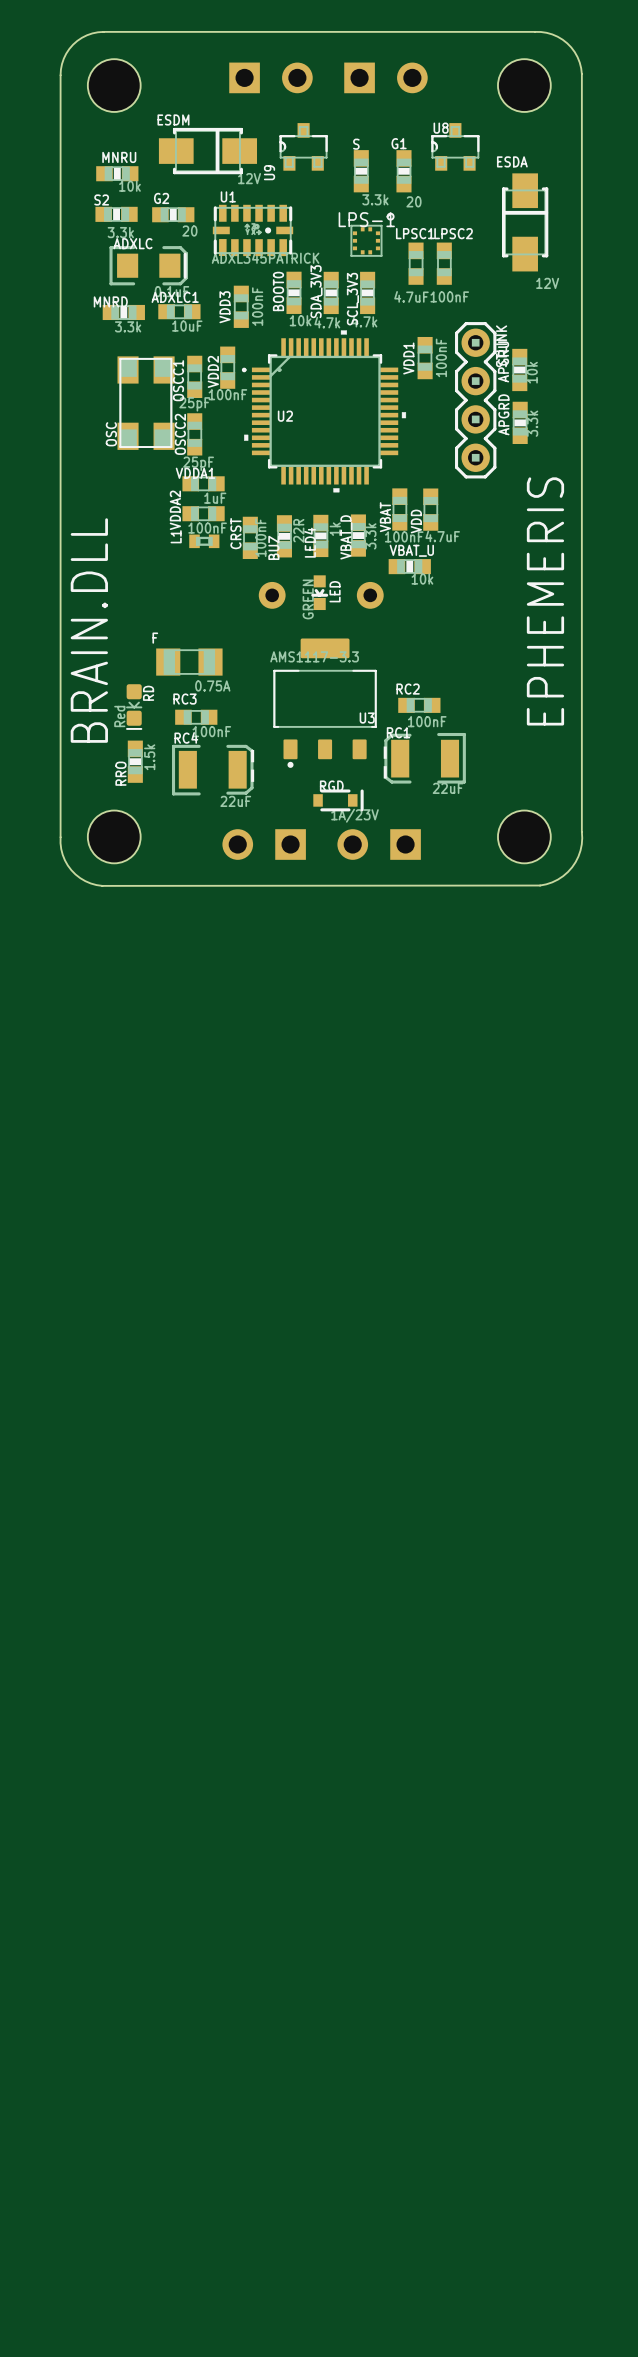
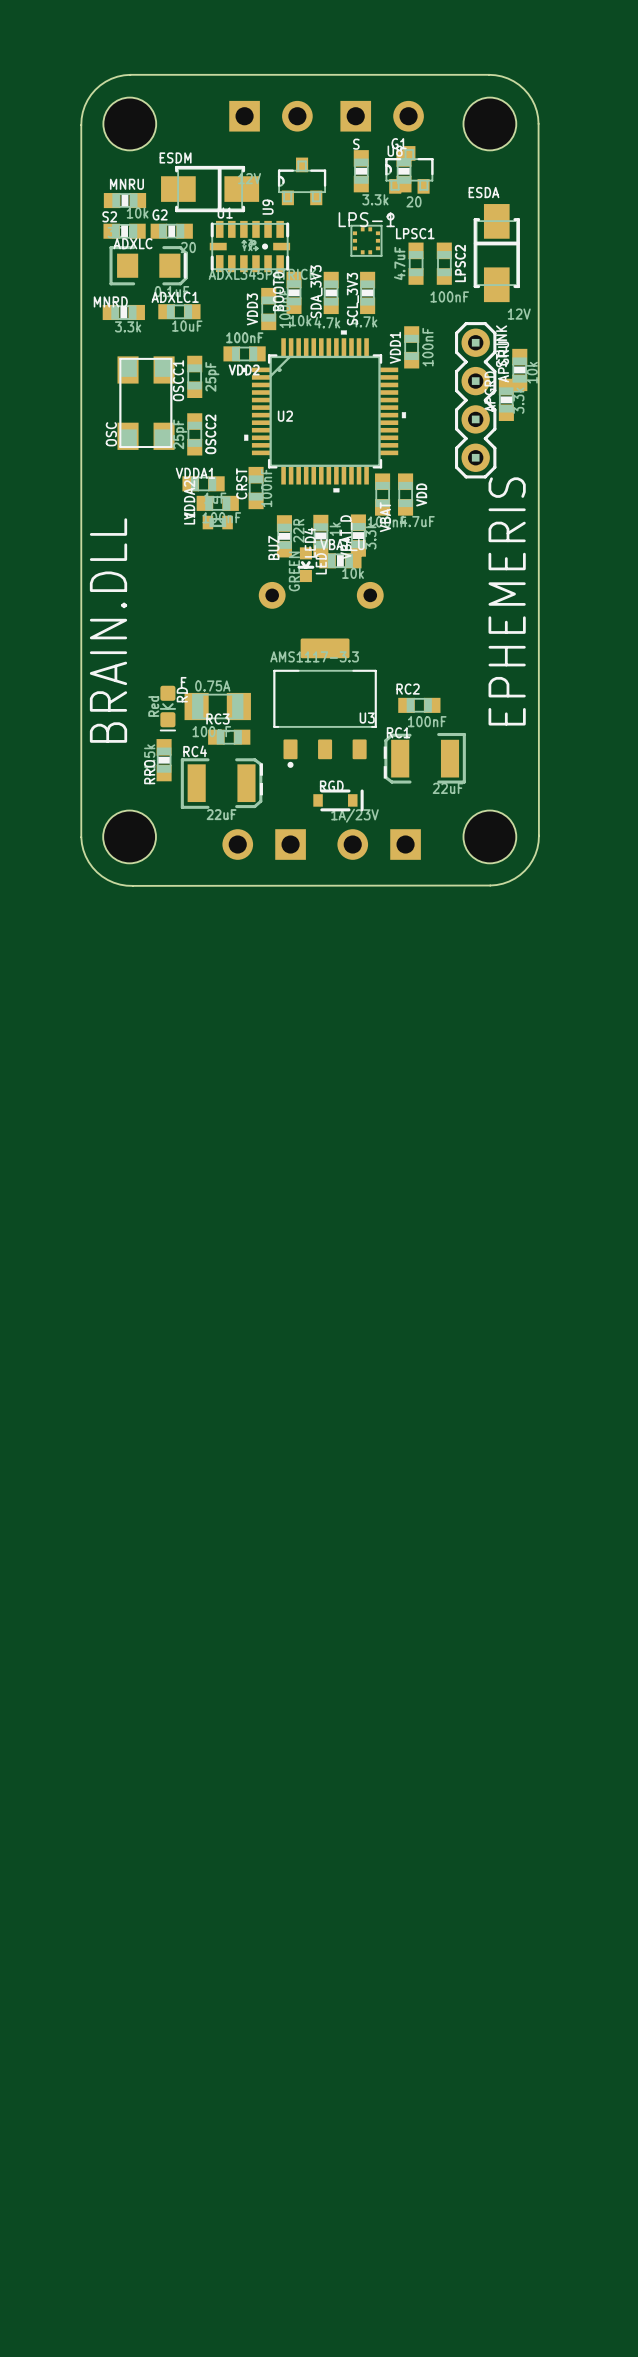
board edge: (103, 31) (540, 31) (552, 34) (562, 39) (571, 47) (577, 57) (581, 74) (582, 838) (580, 850) (575, 862) (567, 872) (557, 879) (540, 885) (102, 885) (90, 883) (80, 878) (71, 870) (64, 860) (60, 843) (60, 75) (63, 58) (73, 44) (87, 35) (103, 31) -> (130, 74) (117, 76) (100, 85) (87, 100) (81, 118) (81, 837) (85, 856) (92, 867) (102, 876) (113, 882) (126, 885) (490, 885) (509, 881) (524, 870) (532, 860) (537, 848) (538, 835) (538, 123) (534, 105) (528, 93) (519, 84) (507, 78) (495, 75) (130, 74)
part position: (270, 77) -> (270, 116)
part position: (385, 77) -> (382, 116)
hole position: (114, 85) -> (129, 123)
hole position: (524, 85) -> (489, 123)
U9 position: (303, 146) -> (302, 181)
U8 position: (455, 146) -> (409, 169)
ESDM position: (207, 151) -> (210, 189)
MNRU position: (117, 173) -> (124, 200)
S2 position: (116, 214) -> (124, 231)
G2 position: (173, 214) -> (171, 231)
ESDA position: (525, 222) -> (496, 253)
U1 position: (253, 230) -> (249, 246)
LPSC2 name rotation: 0° (453, 233) -> 90° counterclockwise (460, 263)
LPSC1 value rotation: 0° (411, 296) -> 90° counterclockwise (399, 263)
VDD3 position: (241, 306) -> (268, 309)
VDD1 position: (425, 358) -> (411, 347)
VDD2 rotation: 0° (227, 367) -> 90° clockwise (244, 353)
VDD2 value position: 100nF (227, 394) -> 100nF (244, 337)
OSCC1 value rotation: 0° (194, 404) -> 90° counterclockwise (212, 376)
APGRD position: (520, 422) -> (506, 399)
OSCC2 name position: OSCC2 (180, 434) -> OSCC2 (210, 434)
OSCC2 value rotation: 0° (198, 463) -> 90° counterclockwise (180, 434)
VBAT position: (399, 509) -> (382, 494)
VDD position: (430, 509) -> (405, 494)
VDDA2 position: (203, 513) -> (217, 503)
VDD name position: VDD (416, 521) -> VDD (421, 494)
CRST position: (250, 537) -> (256, 488)
L1 position: (204, 541) -> (217, 522)
VBAT_U position: (409, 566) -> (340, 560)
LED position: (319, 592) -> (305, 564)
text position: EPHEMERIS (545, 601) -> EPHEMERIS (507, 601)
text position: BRAIN.DLL (89, 630) -> BRAIN.DLL (108, 630)
F position: (189, 662) -> (217, 706)
RD position: (134, 707) -> (167, 708)
RD value position: Red (119, 716) -> Red (153, 706)
RC3 position: (196, 717) -> (229, 737)
RRO position: (135, 761) -> (164, 760)
RC4 position: (213, 770) -> (221, 783)
RC4 value position: 22uF (235, 801) -> 22uF (221, 814)
hole position: (114, 836) -> (129, 836)
hole position: (524, 836) -> (489, 836)

